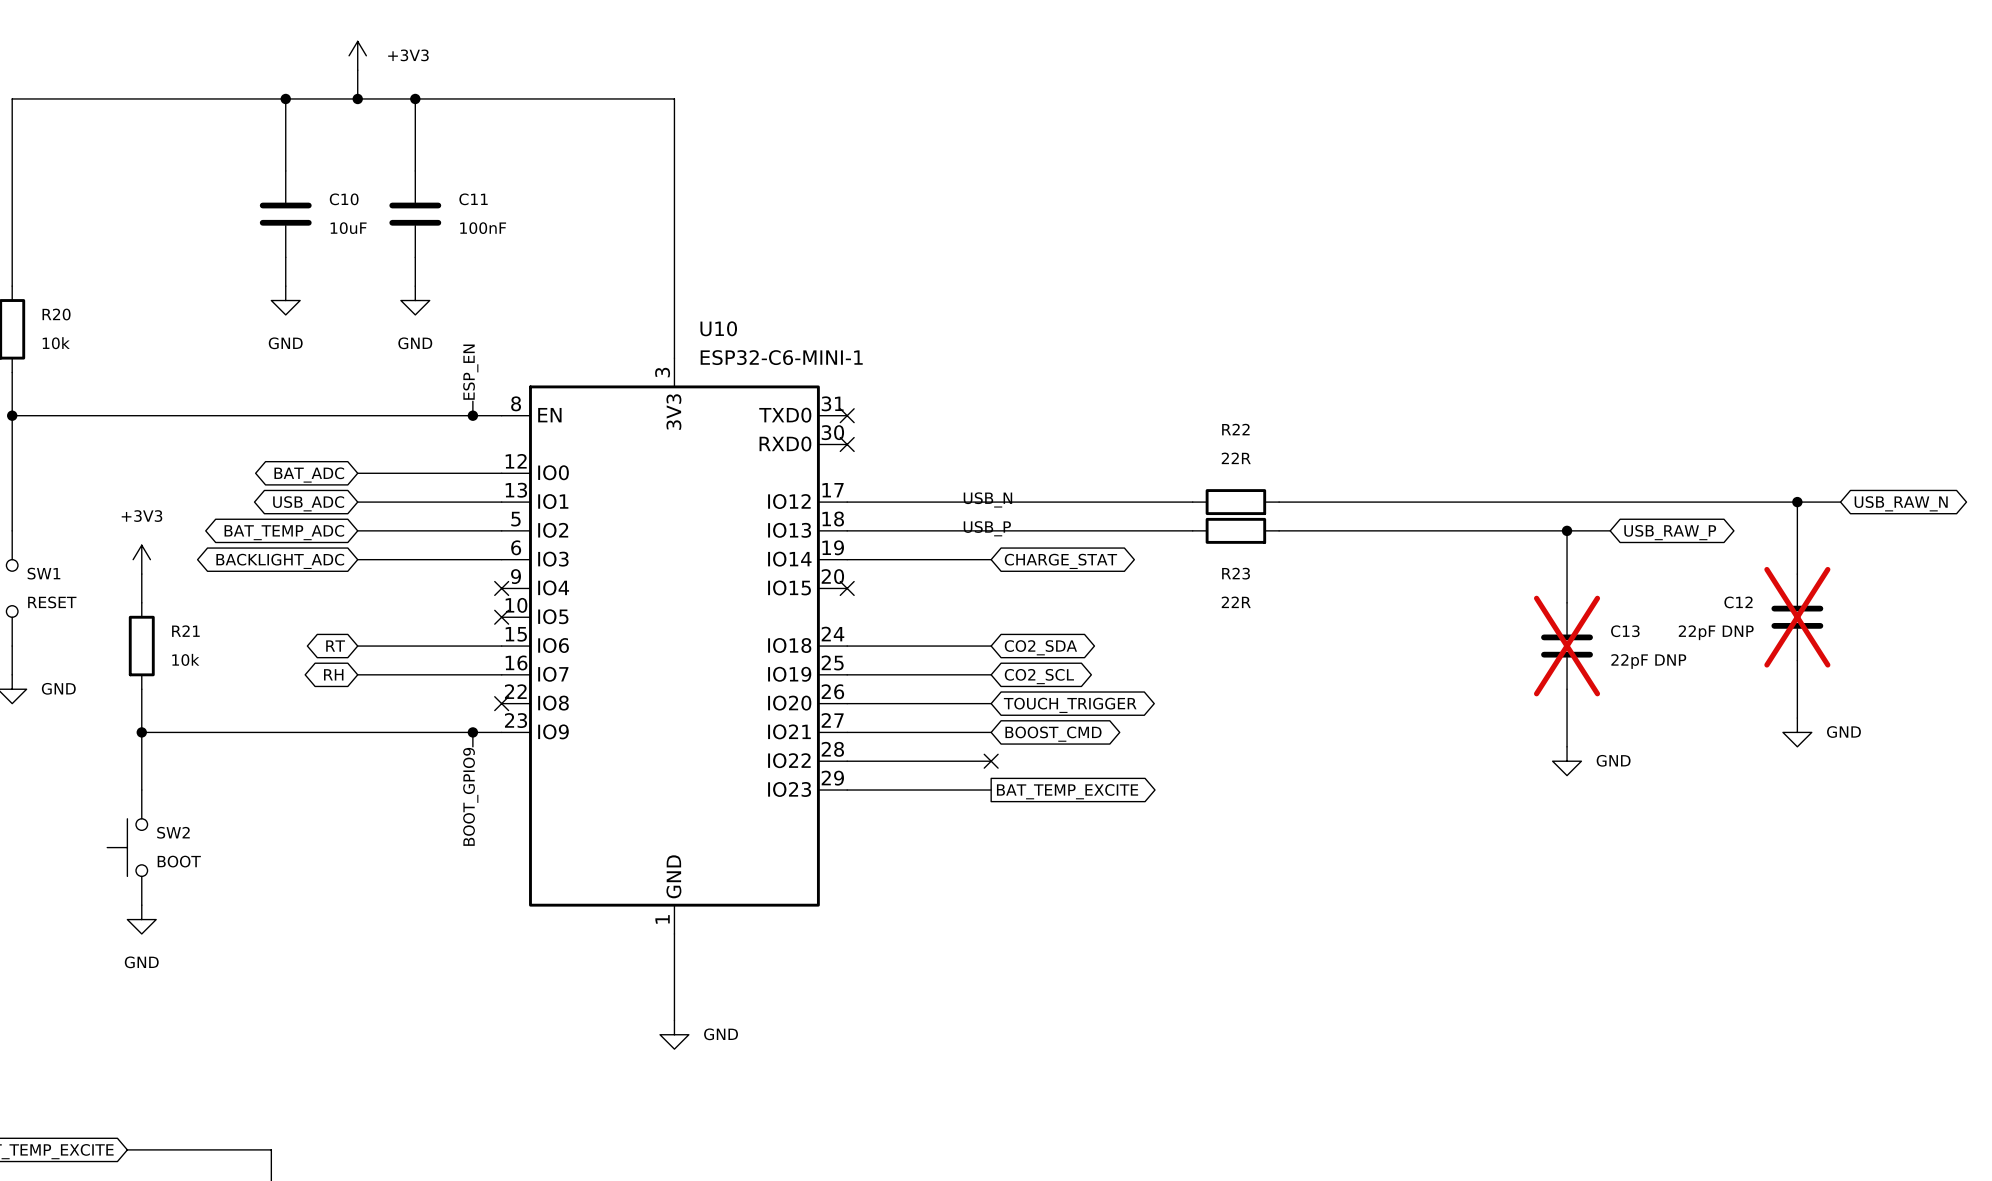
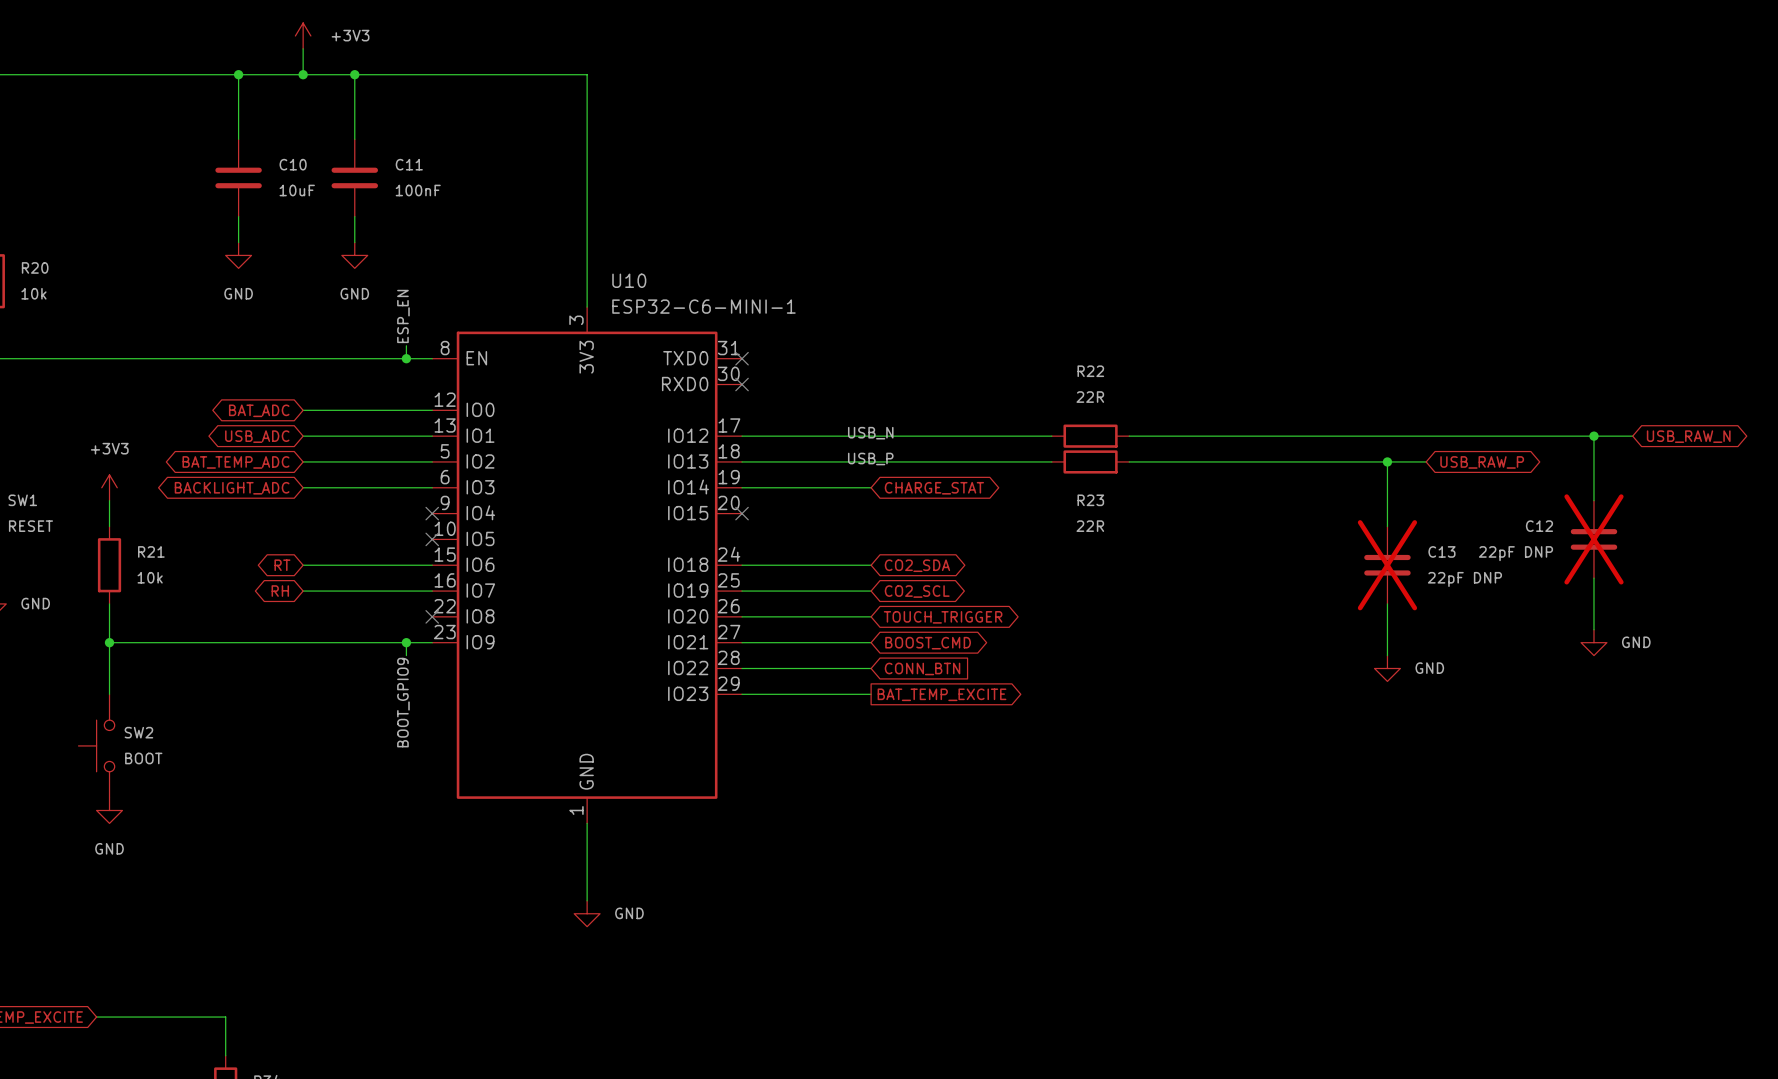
no-connect mark: (991, 761) -> none
global label: none -> CONN_BTN (922, 668)

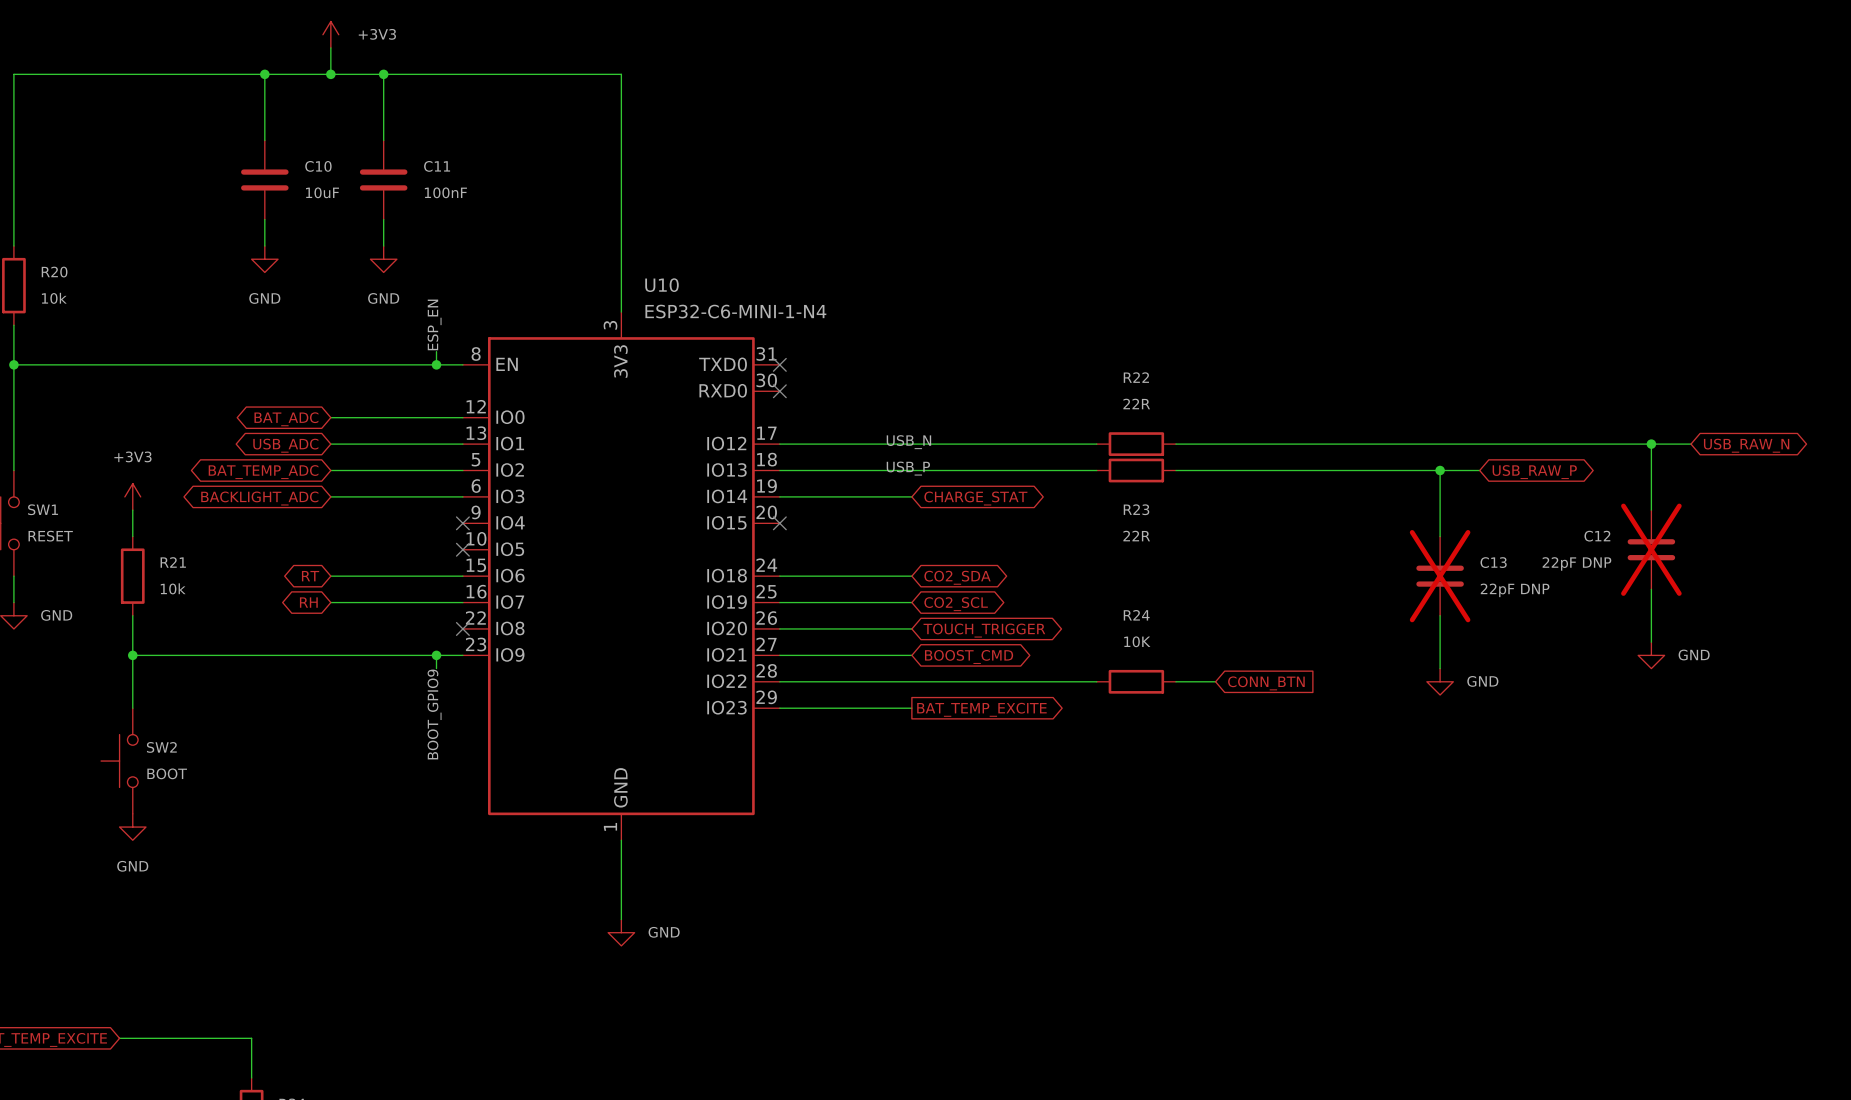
U10 value: ESP32-C6-MINI-1 (703, 306) -> ESP32-C6-MINI-1-N4 (735, 311)
wire: none -> (911, 681) (1096, 681)
global label: CONN_BTN (922, 668) -> none
R24: none -> 10K (1136, 681)
wire: none -> (1175, 681) (1215, 681)
global label: none -> CONN_BTN (1266, 683)

